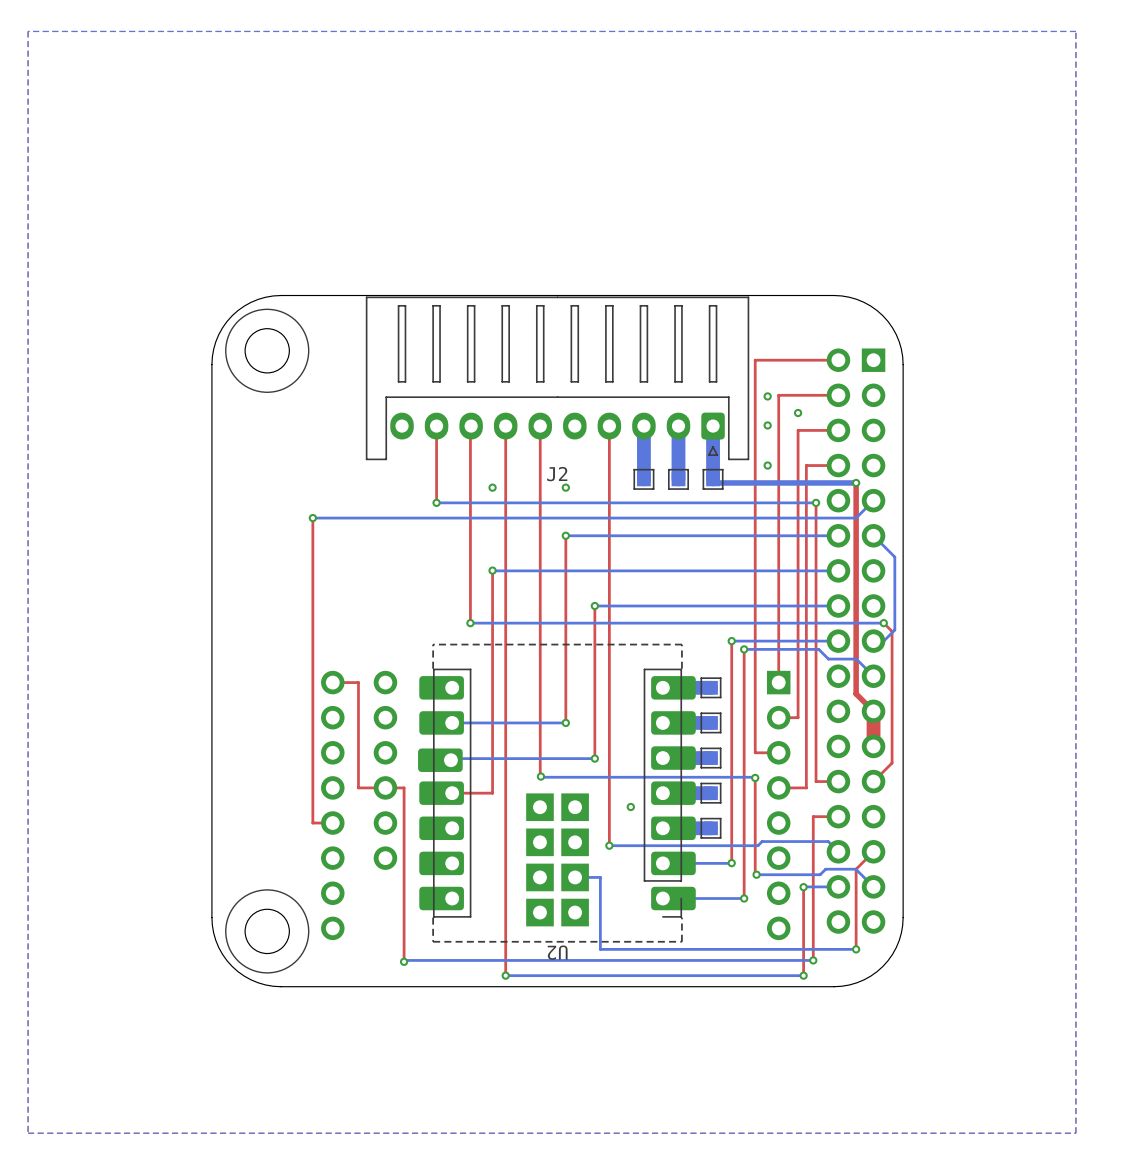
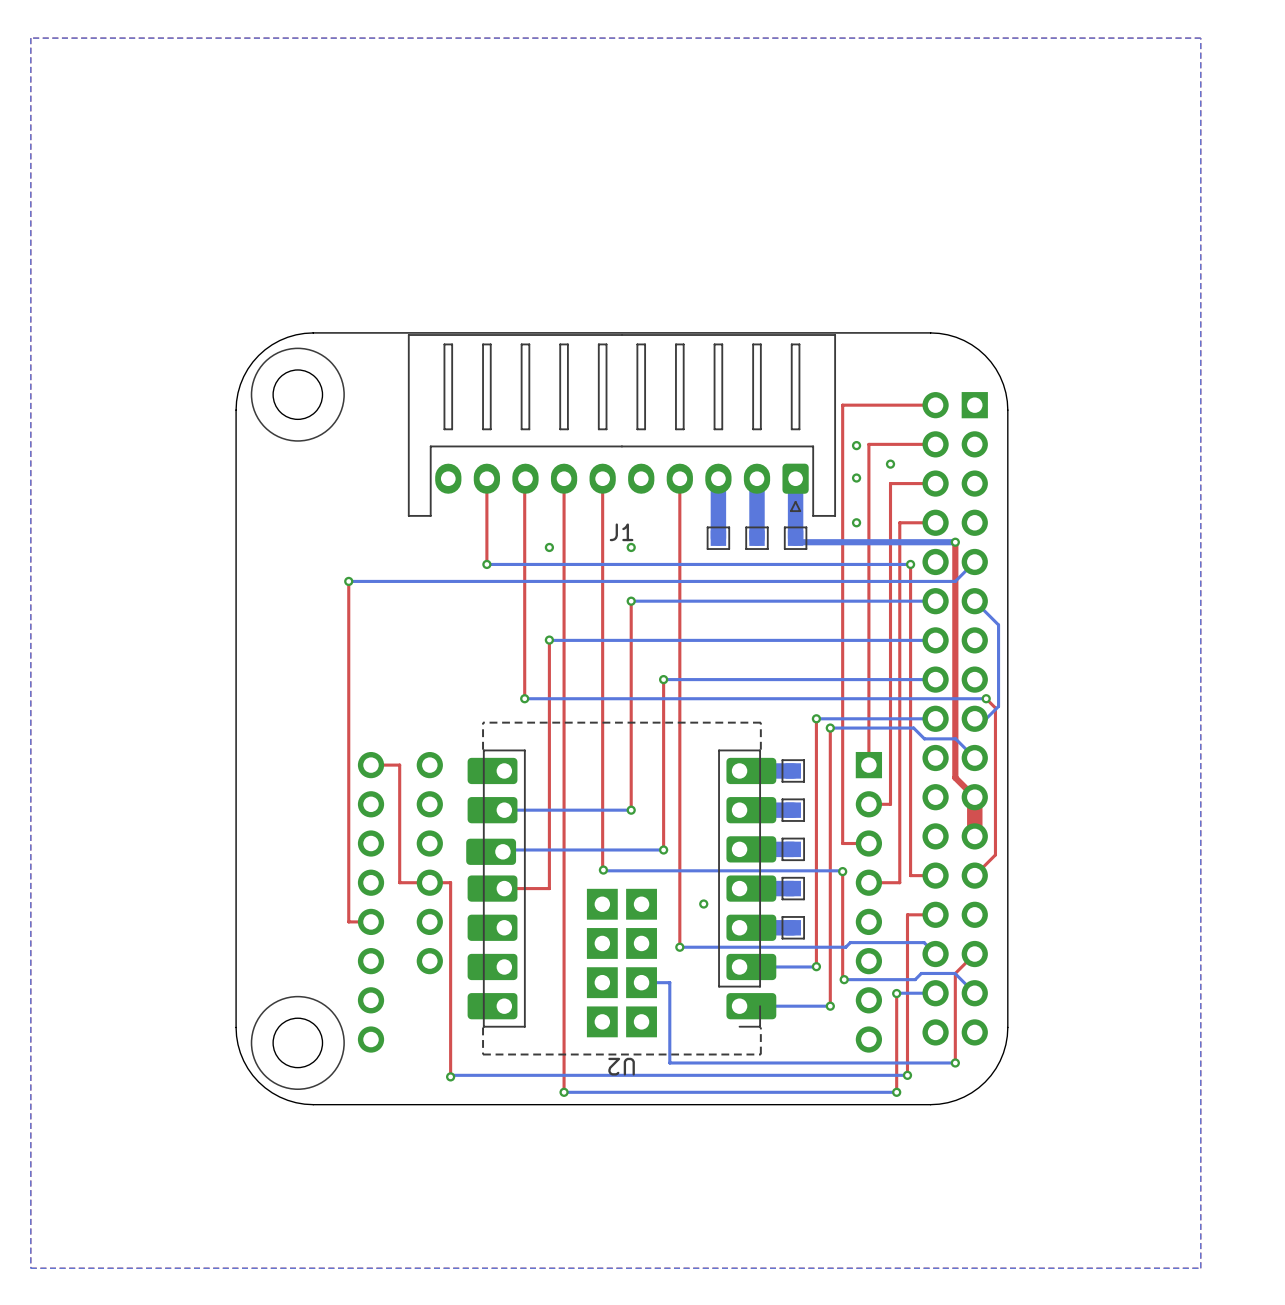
J2 name: J2 (557, 474) -> J1 (621, 532)

